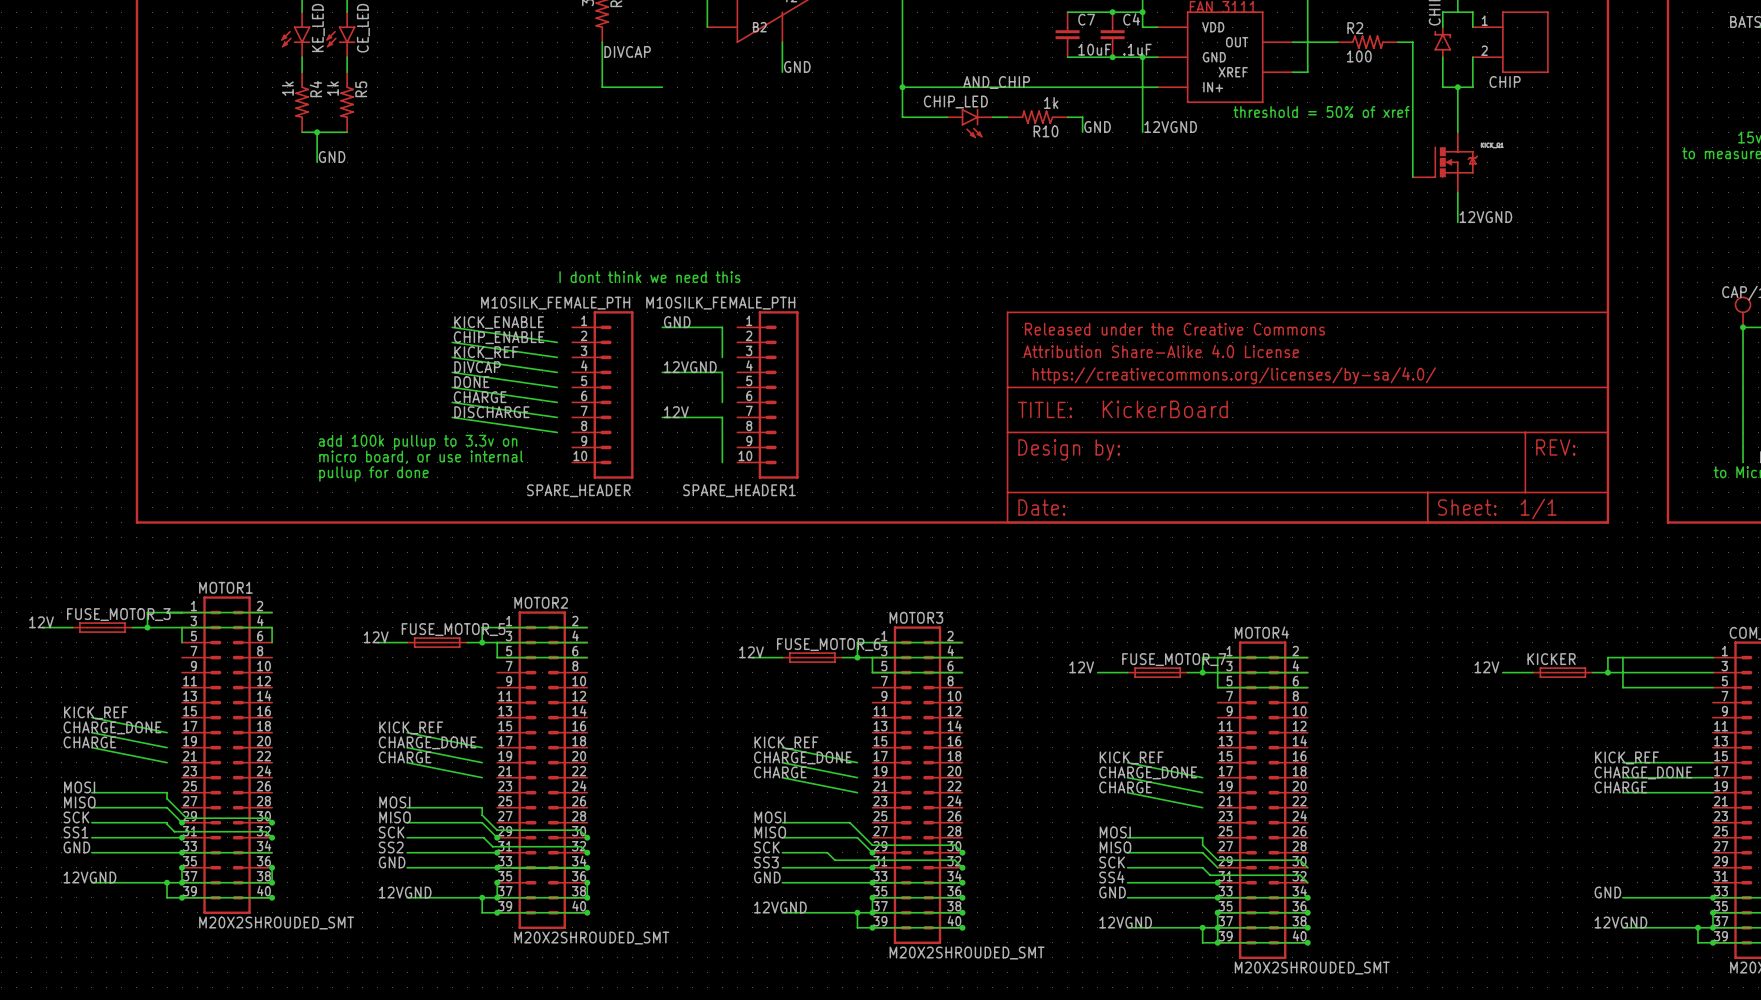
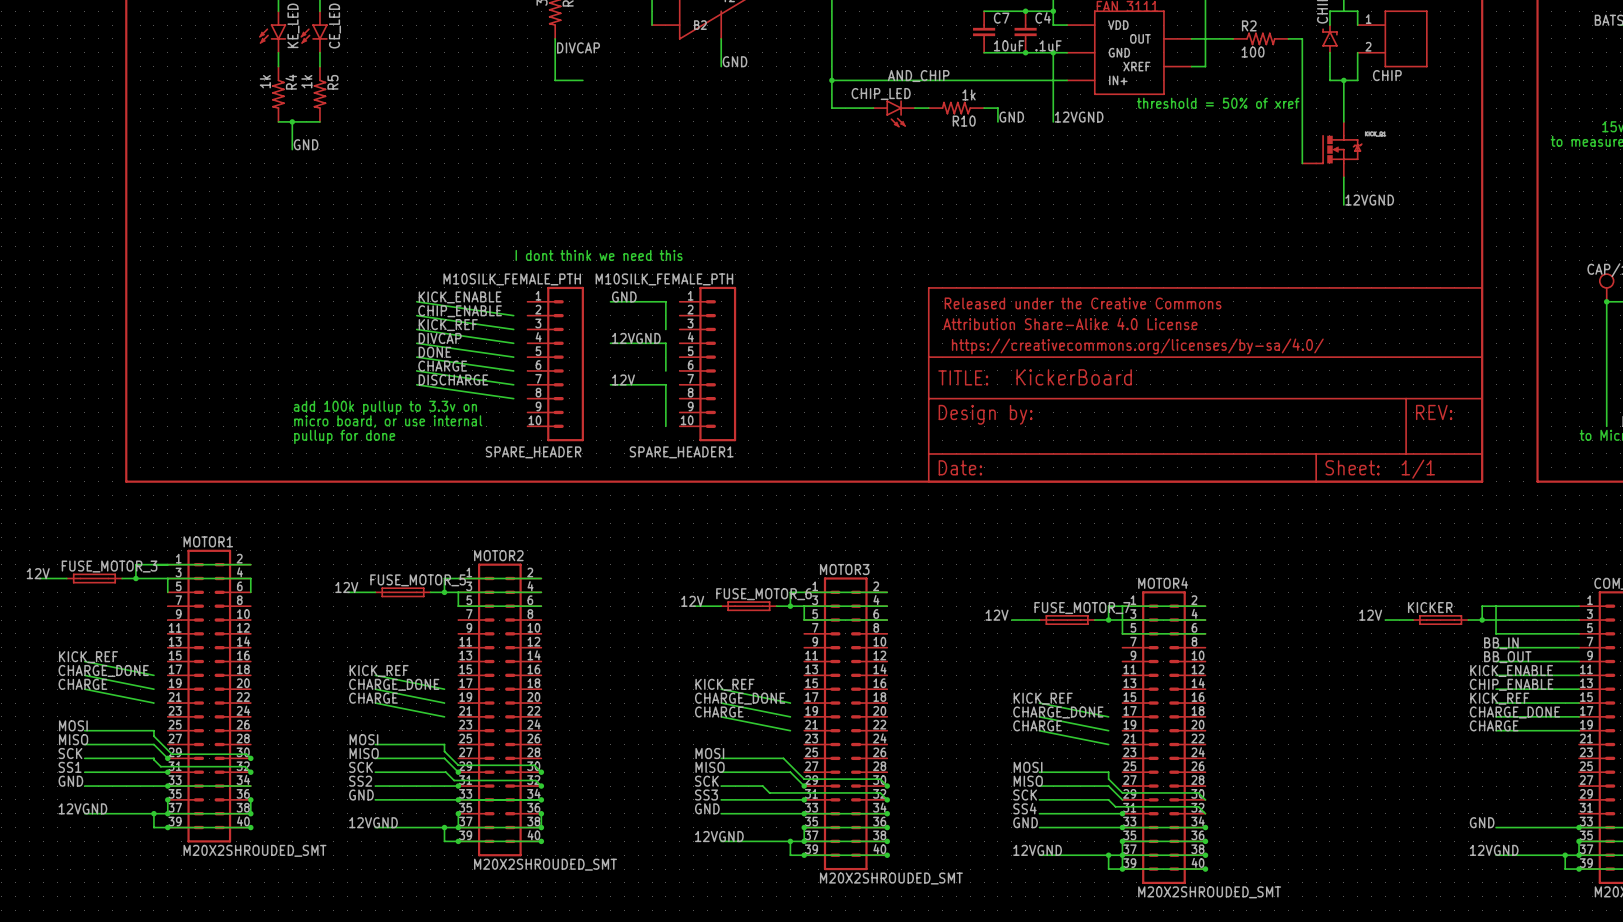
wire: (632, 87) (662, 87) -> none
label: none -> BB_IN (1501, 643)
wire: none -> (1496, 647) (1579, 647)
label: none -> BB_OUT (1507, 657)
wire: none -> (1496, 661) (1579, 661)
label: none -> KICK_ENABLE (1511, 670)
wire: none -> (1496, 675) (1579, 675)
label: none -> CHIP_ENABLE (1511, 684)
wire: none -> (1496, 689) (1579, 689)

